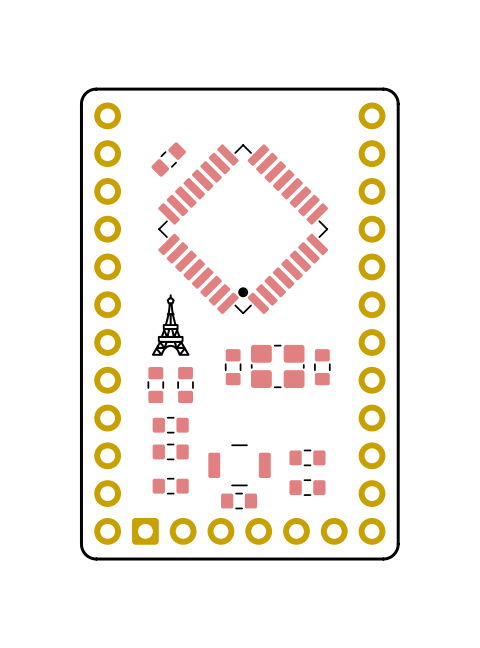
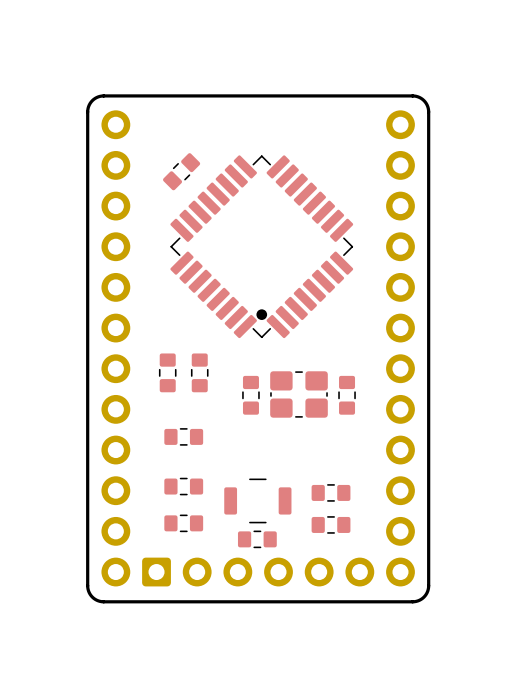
drawing: [151, 294, 190, 356] -> none
part: none -> (167, 372)
part: none -> (199, 372)
part: (155, 385) -> none
part: (185, 385) -> none
part: none -> (183, 436)
part: (170, 425) -> none

